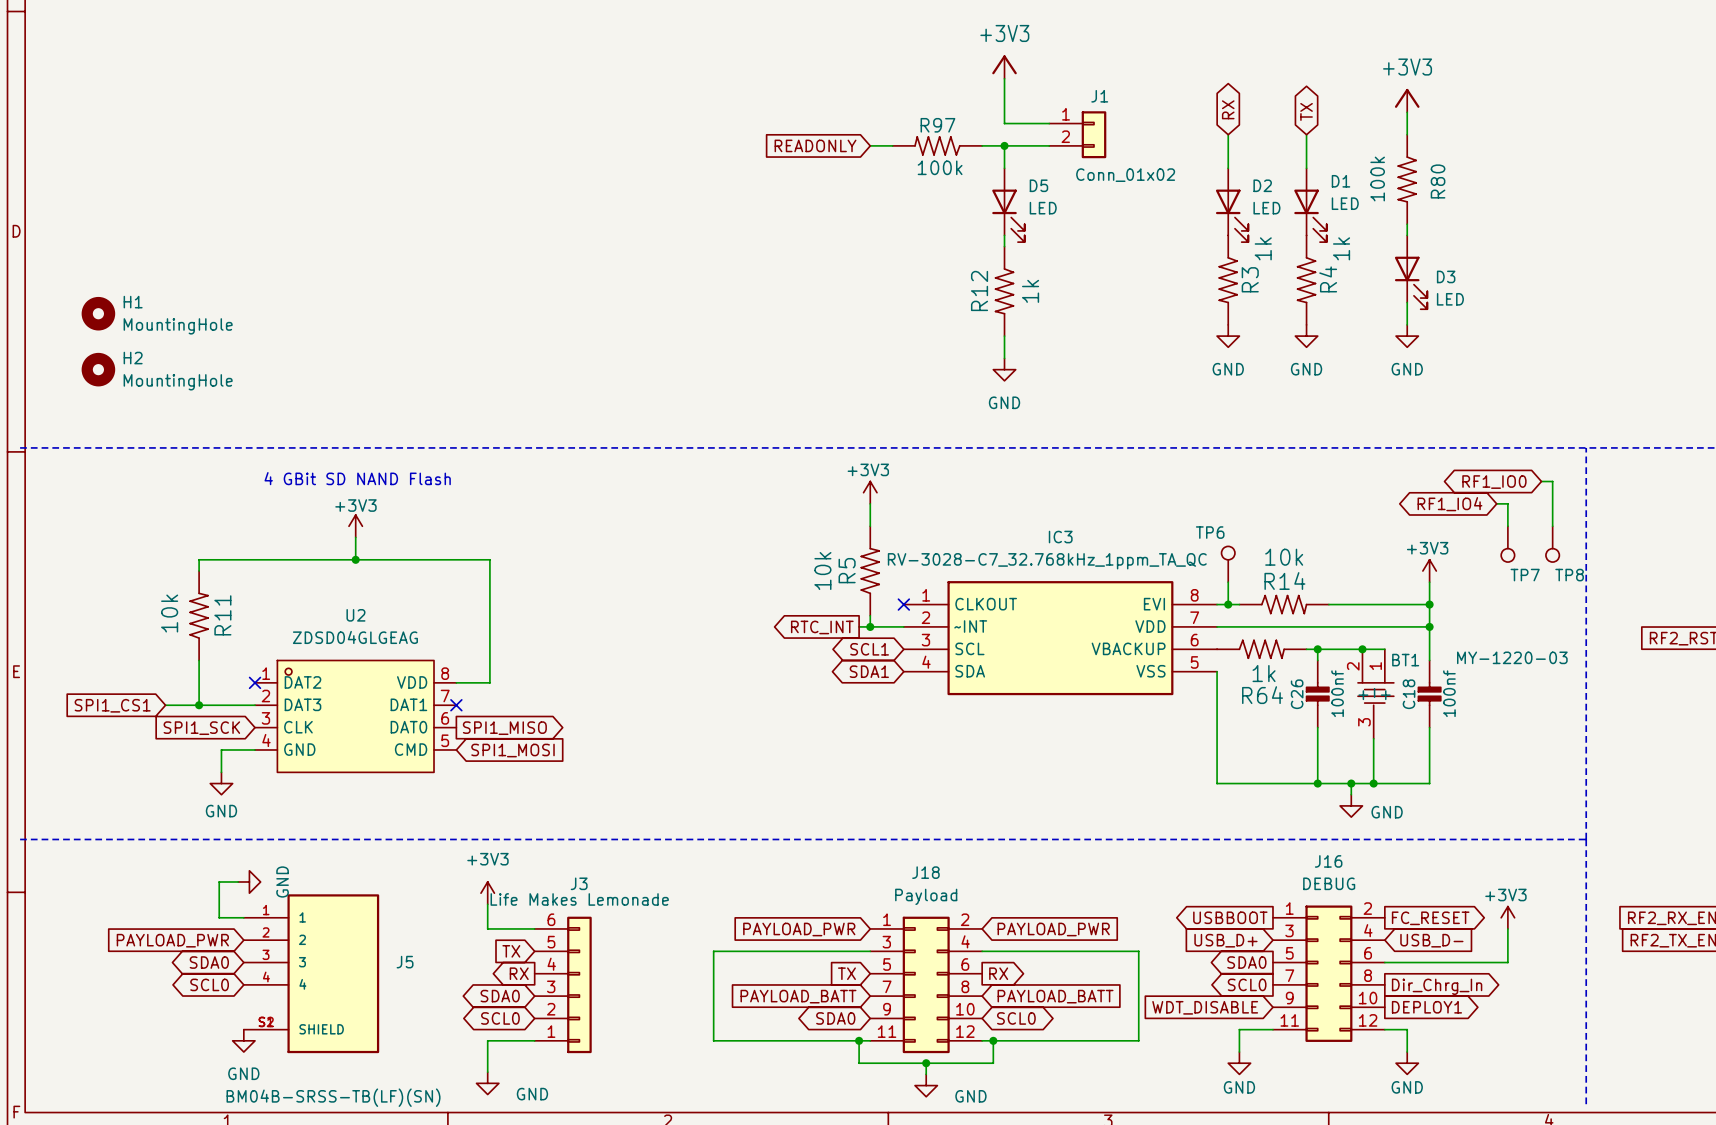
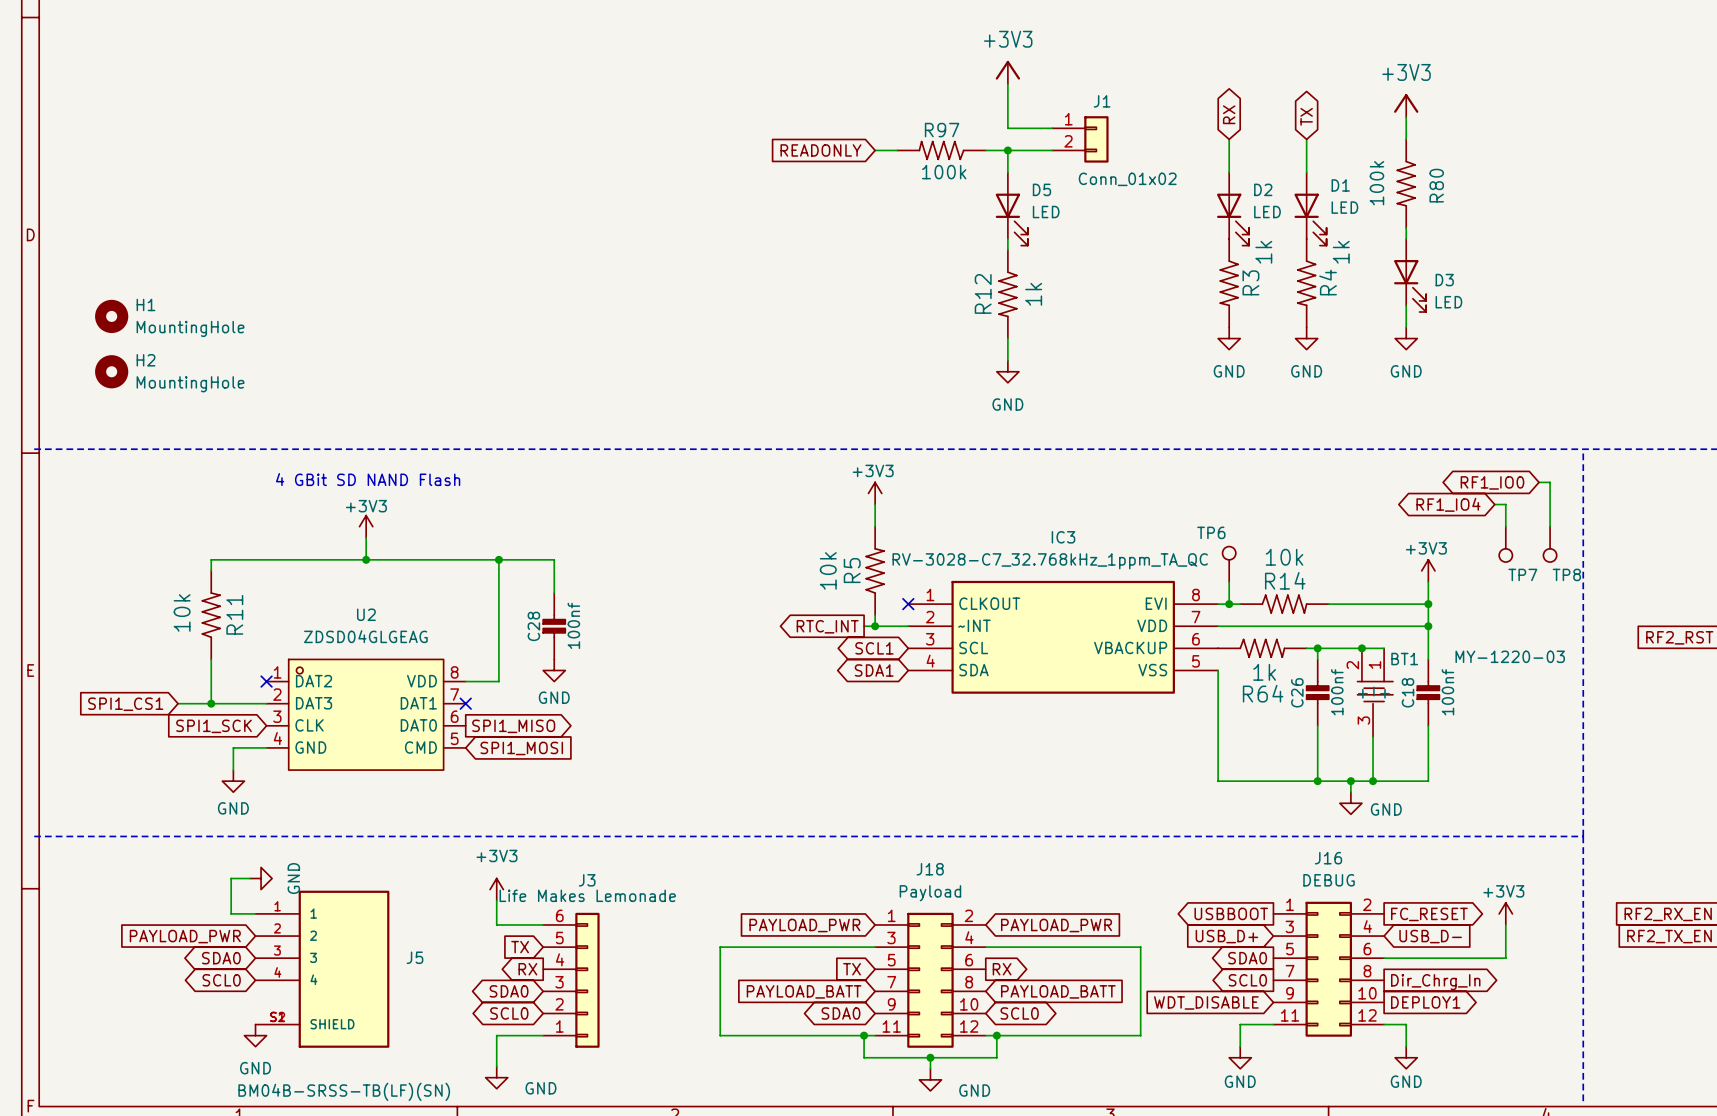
wire: none -> (498, 559) (554, 559) (554, 593)
junction: none -> (498, 559)
C28: none -> 100nf (554, 626)
power symbol: none -> GND (554, 670)

